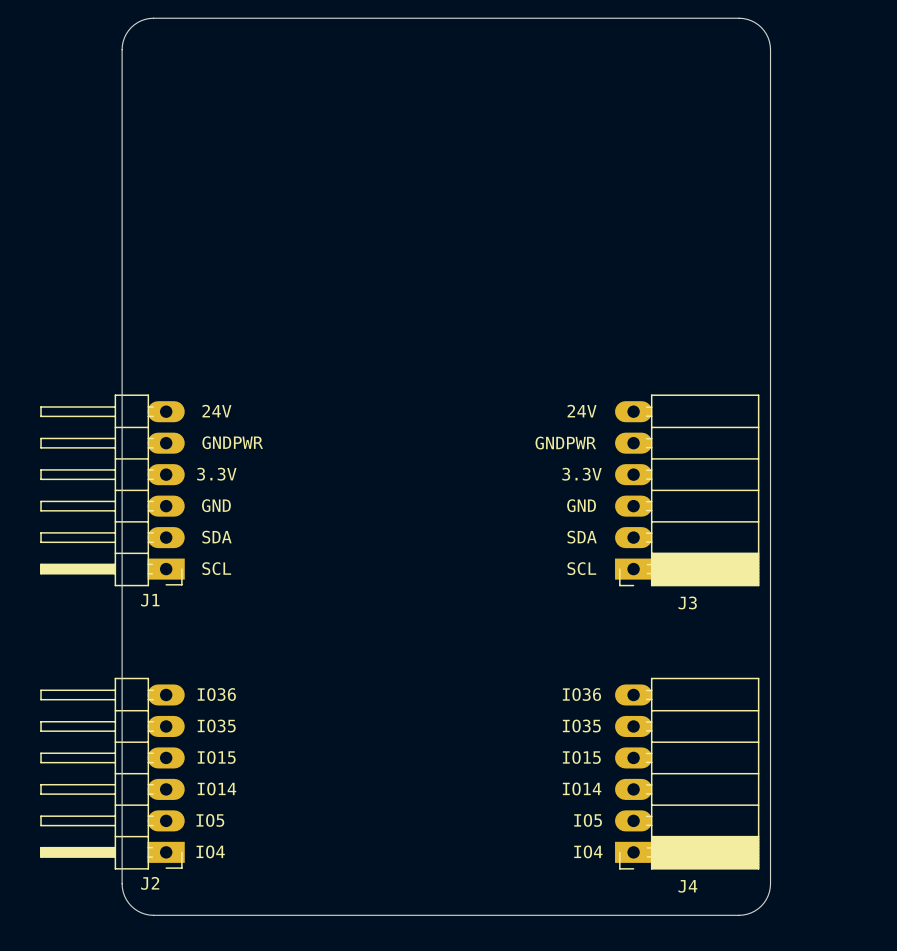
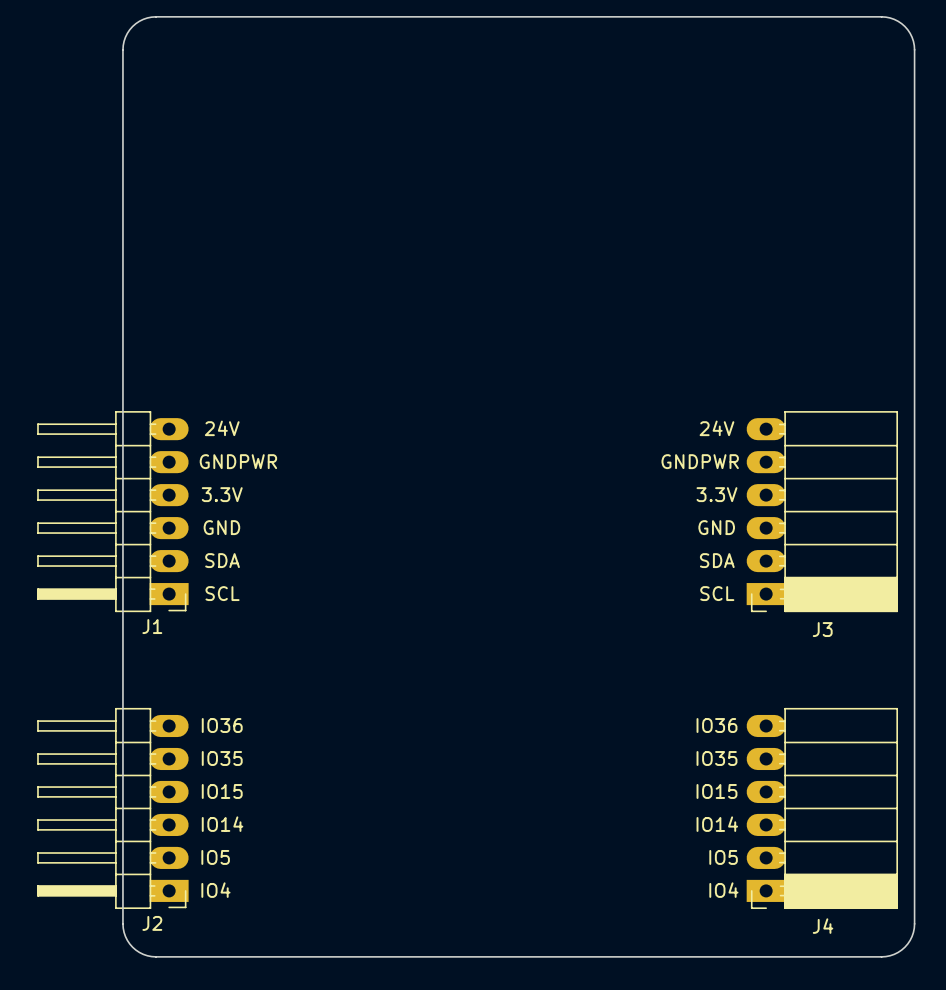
board edge: (739, 18) (751, 20) (761, 27) (768, 37) (770, 49) (770, 883) (768, 895) (761, 906) (751, 912) (739, 915) -> (769, 16) (890, 17) (901, 23) (907, 29) (912, 37) (914, 49) (914, 928) (910, 940) (904, 947) (894, 954) (885, 956) (769, 956)
text position: 24V (582, 411) -> 24V (716, 428)
text position: GNDPWR (565, 443) -> GNDPWR (700, 461)
text position: 3.3V (581, 474) -> 3.3V (716, 494)
J3 position: (687, 490) -> (822, 511)
text position: GND (581, 505) -> GND (716, 527)
text position: SDA (582, 537) -> SDA (717, 560)
text position: SCL (581, 568) -> SCL (717, 593)
text position: IO36 (581, 694) -> IO36 (716, 725)
text position: IO35 (581, 726) -> IO35 (716, 758)
text position: IO15 (581, 757) -> IO15 (716, 791)
J4 position: (687, 773) -> (822, 808)
text position: IO14 (582, 788) -> IO14 (717, 824)
text position: IO5 (588, 820) -> IO5 (723, 857)
text position: IO4 (588, 851) -> IO4 (723, 890)

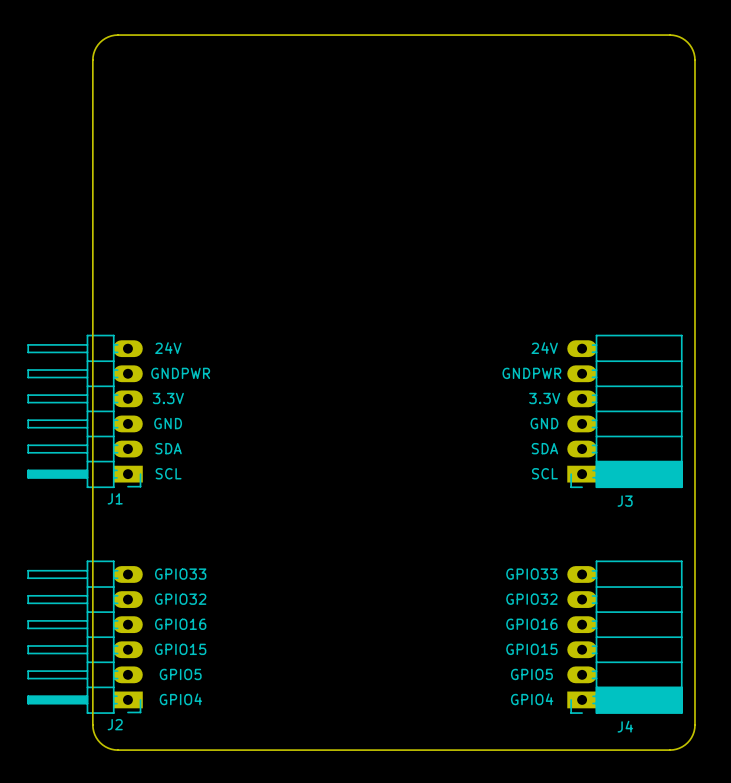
text: IO36 (222, 725) -> none
text: none -> GPIO33 (180, 574)
text: none -> GPIO33 (531, 574)
text: IO36 (716, 725) -> none
text: IO35 (222, 758) -> none
text: none -> GPIO32 (180, 599)
text: none -> GPIO32 (531, 599)
text: IO35 (716, 758) -> none
text: IO15 (222, 791) -> none
text: none -> GPIO16 (180, 624)
text: none -> GPIO16 (531, 624)
text: IO15 (716, 791) -> none
text: IO14 (222, 824) -> none
text: none -> GPIO15 (180, 649)
text: none -> GPIO15 (531, 649)
text: IO14 (717, 824) -> none
text: IO5 (215, 857) -> GPIO5 (180, 674)
text: IO5 (723, 857) -> GPIO5 (531, 674)
text: IO4 (215, 890) -> GPIO4 (180, 699)
text: IO4 (723, 890) -> GPIO4 (532, 699)

